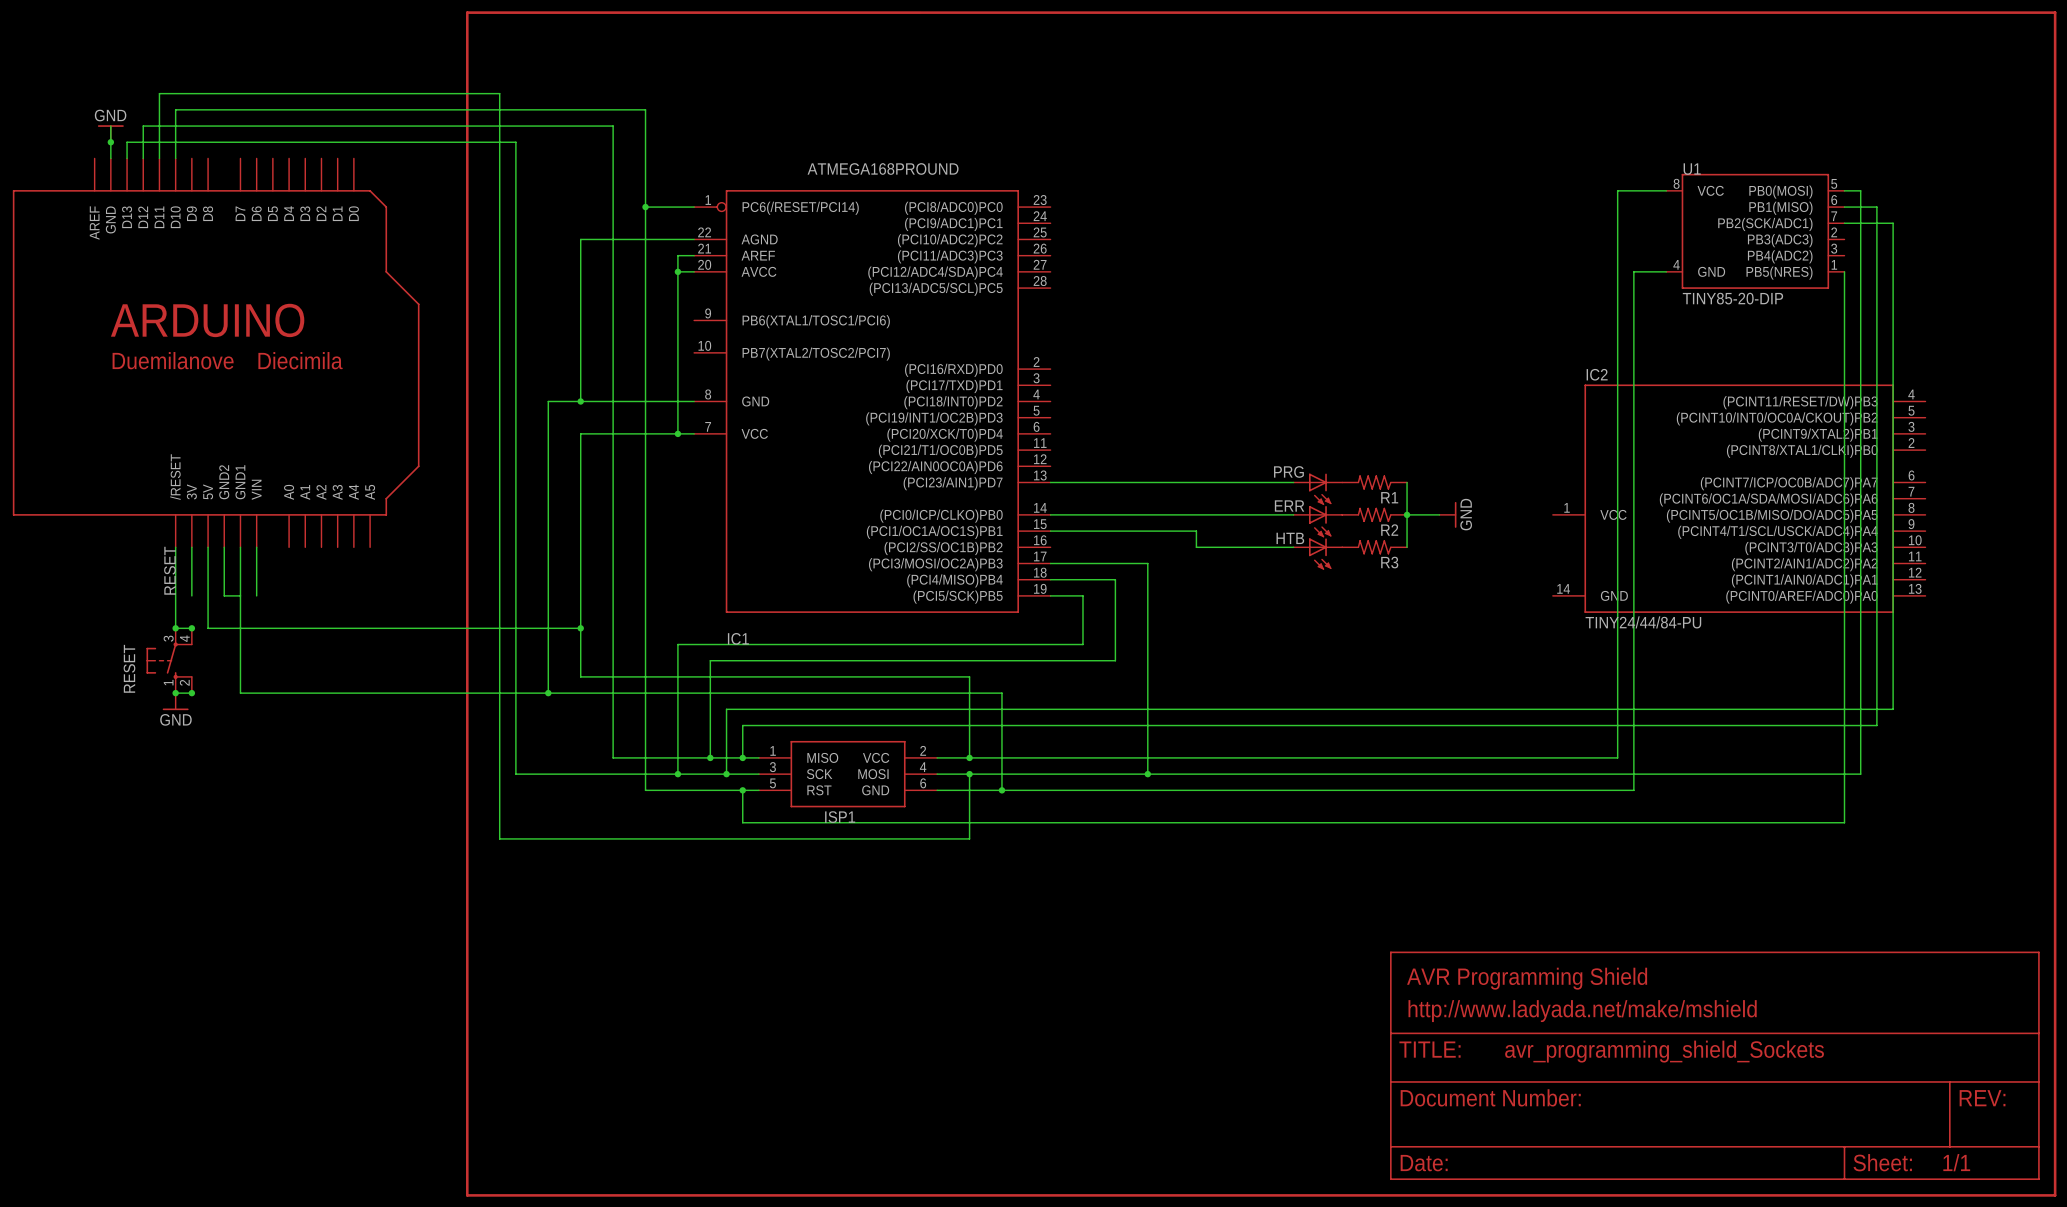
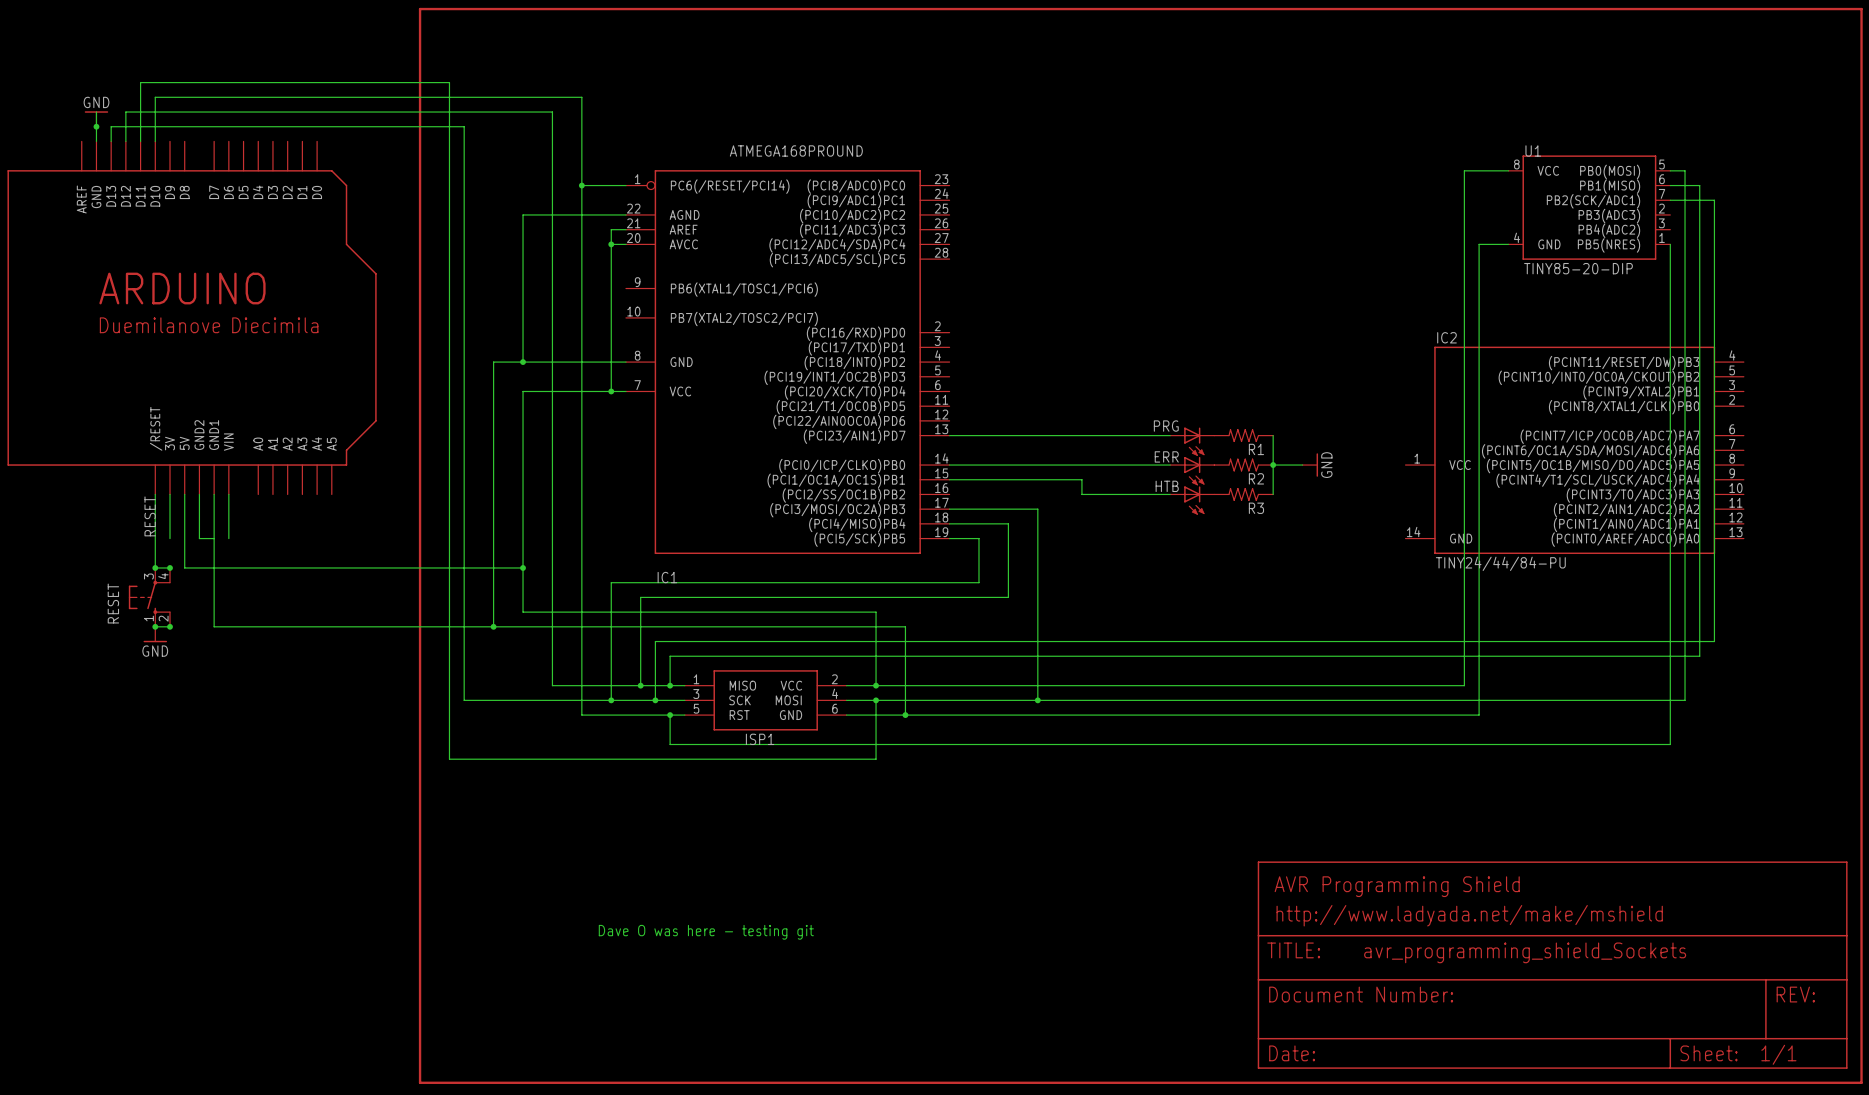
text: none -> Dave O was here - testing git (706, 932)

